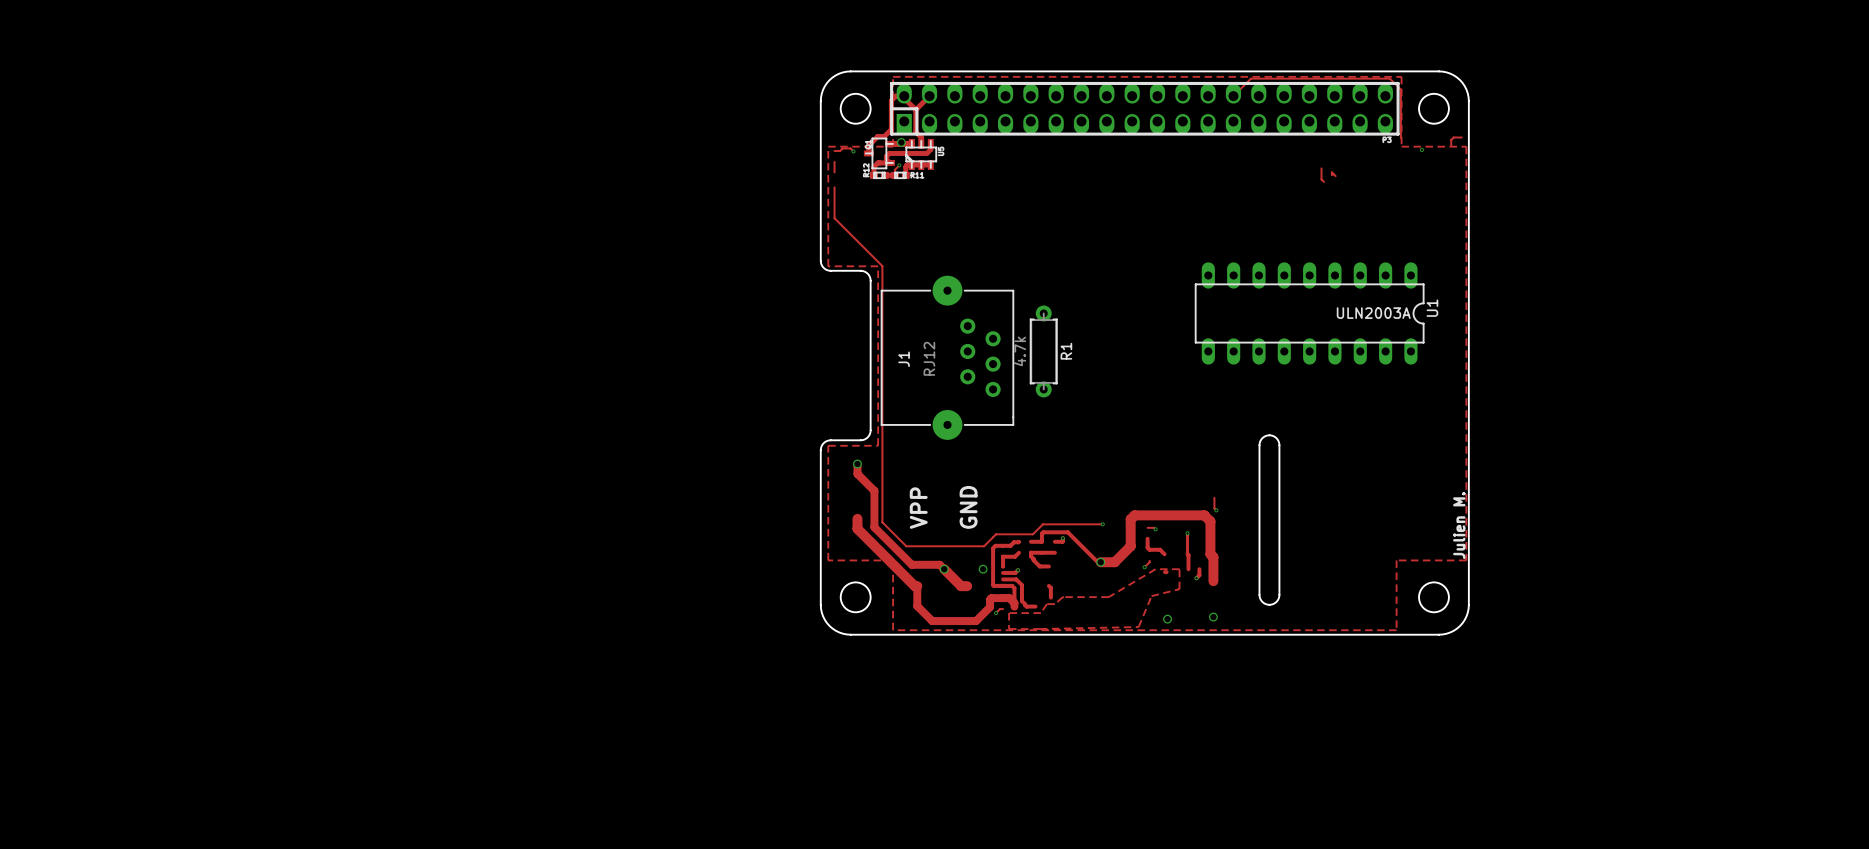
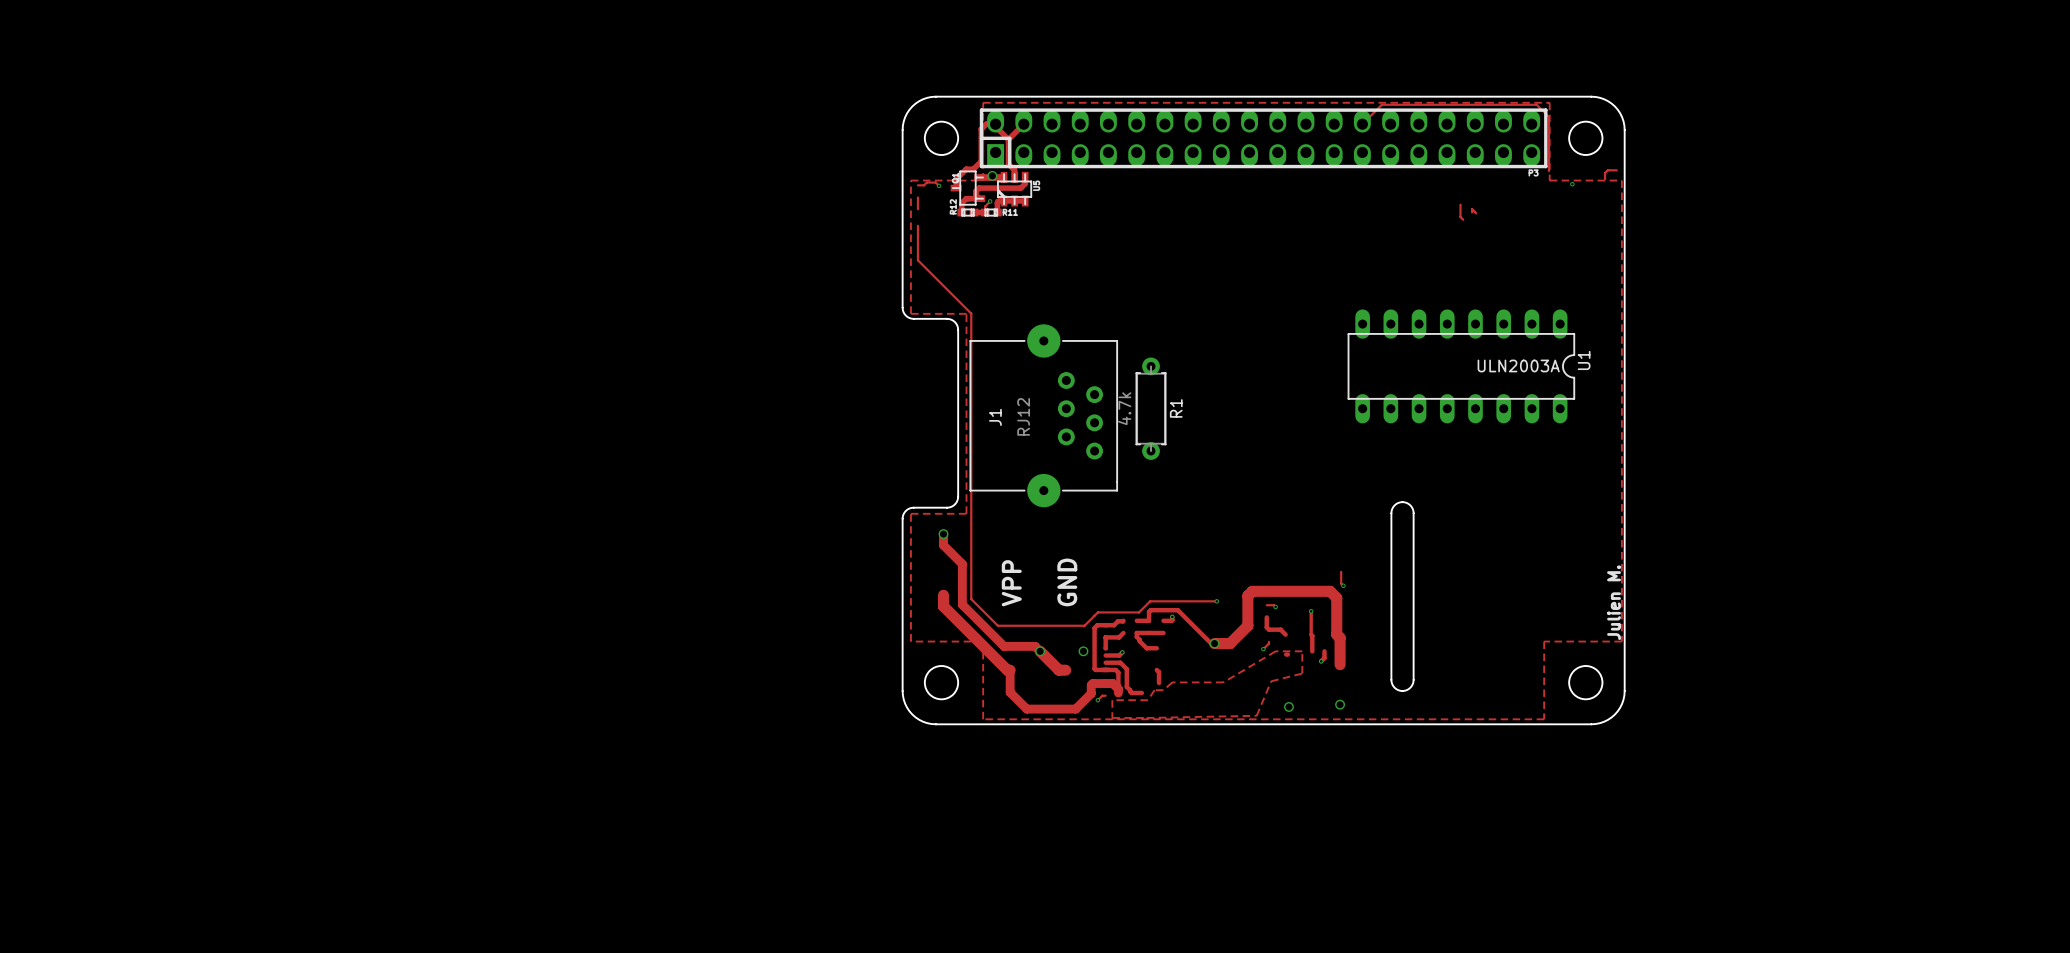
U1 footprint: [1194, 262, 1425, 365] -> [1347, 309, 1576, 424]

